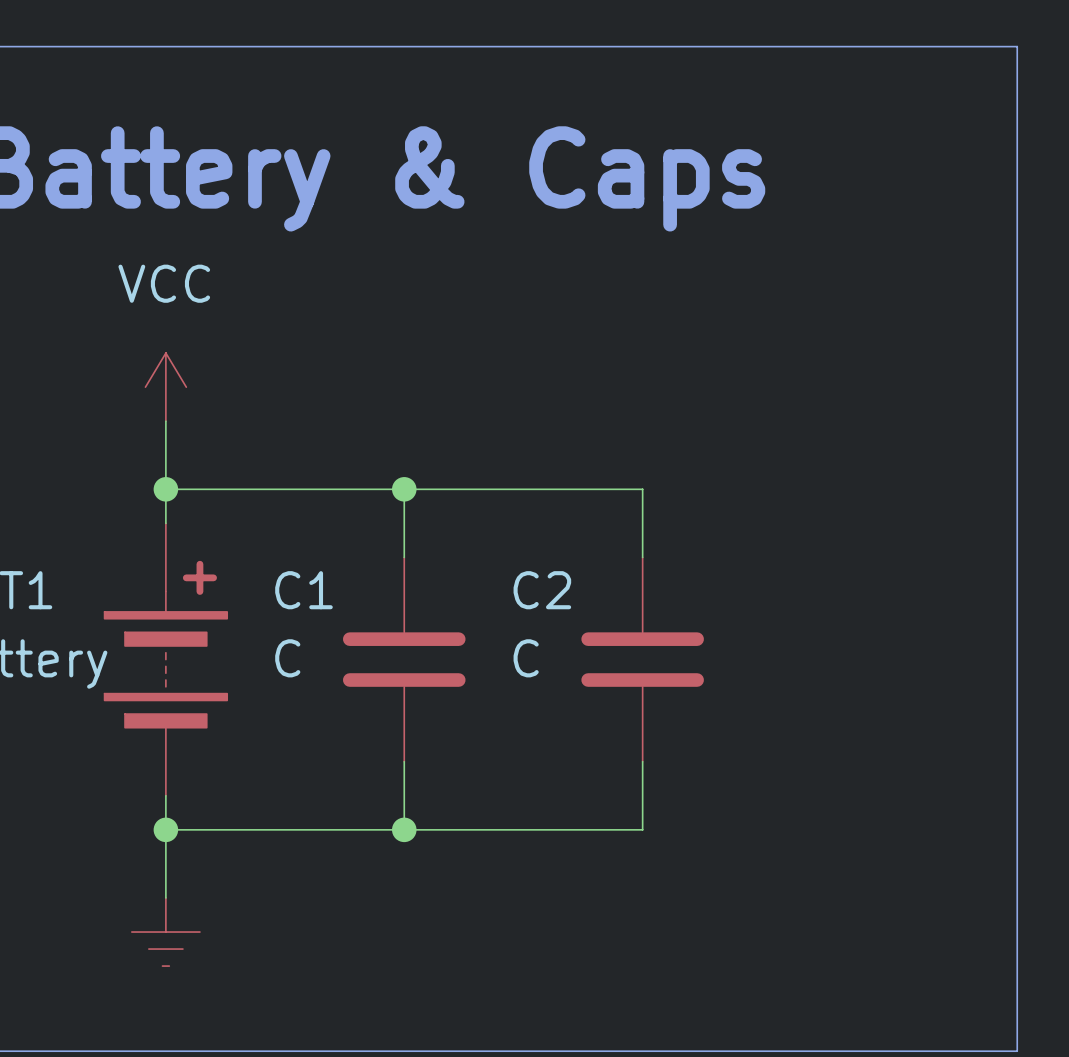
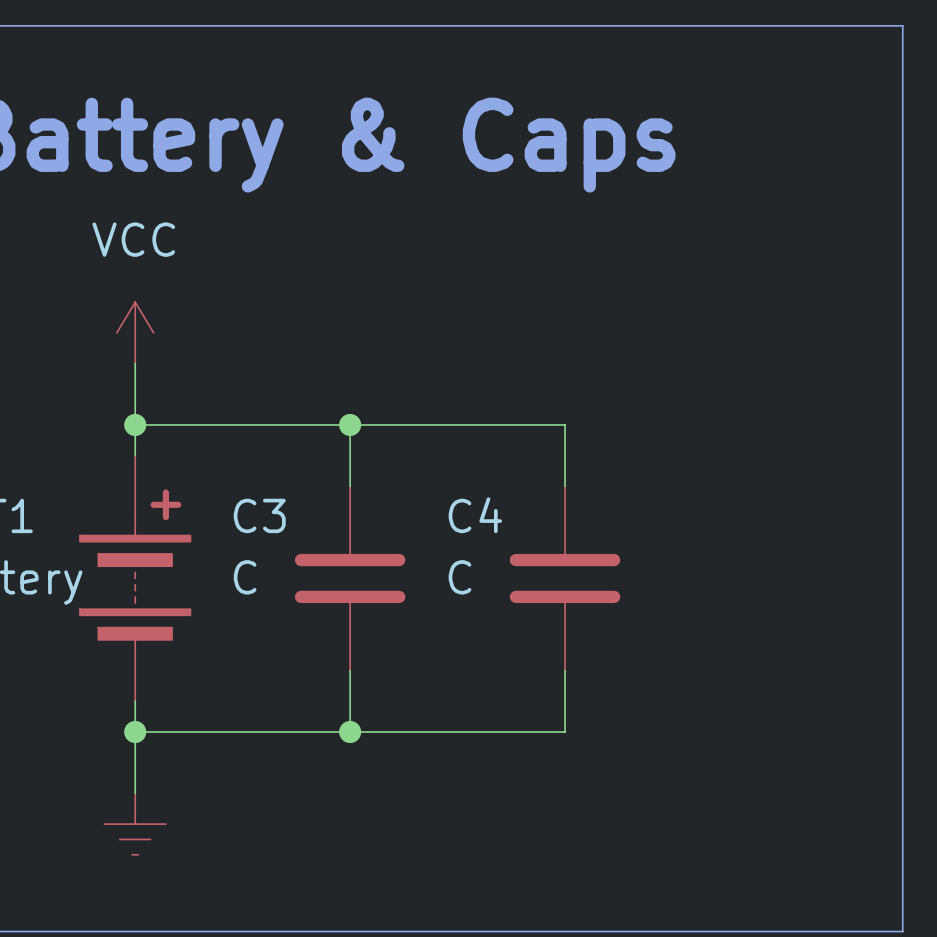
C1 name: C1 (303, 590) -> C3 (259, 515)
C2 name: C2 (542, 590) -> C4 (475, 515)

